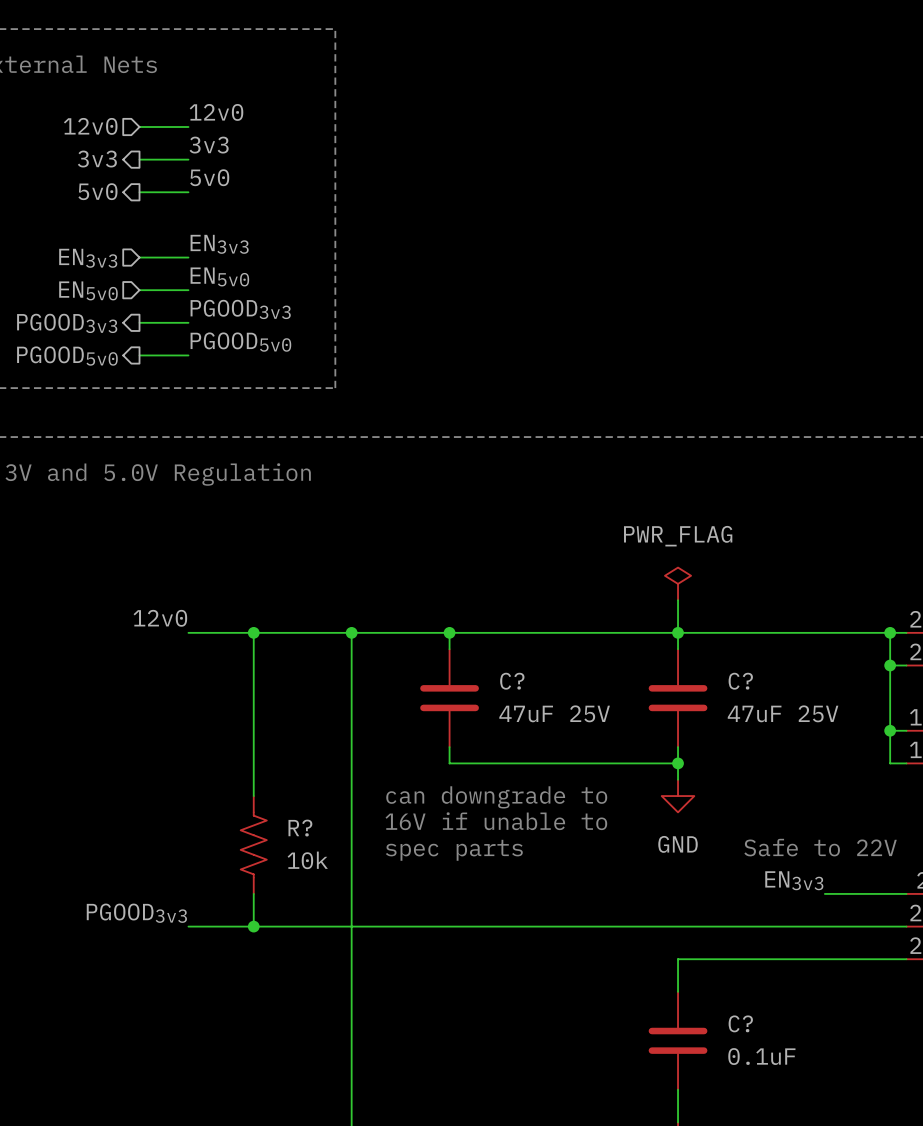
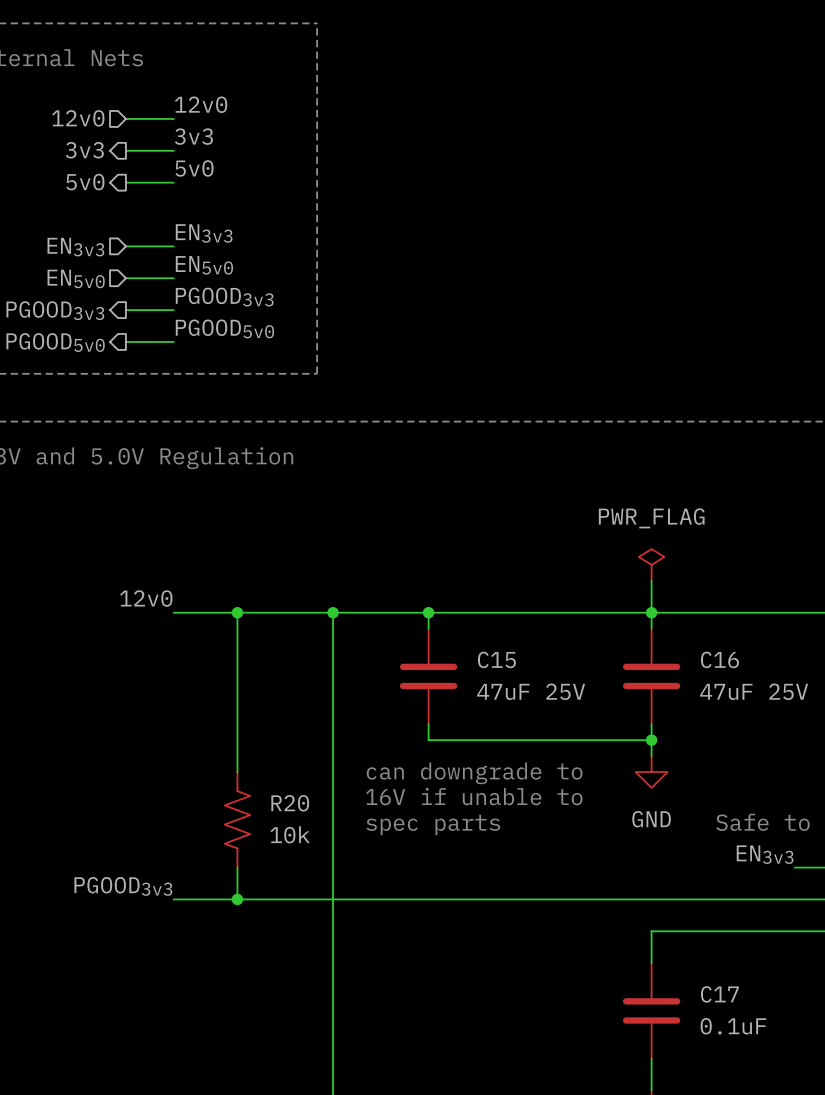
C? name: C? (512, 681) -> C15 (496, 659)
C? name: C? (740, 681) -> C16 (719, 659)
R? name: R? (300, 828) -> R20 (290, 803)
C? name: C? (740, 1023) -> C17 (719, 994)

